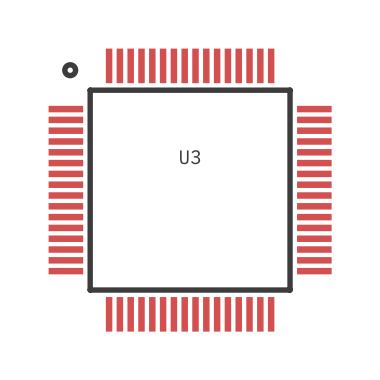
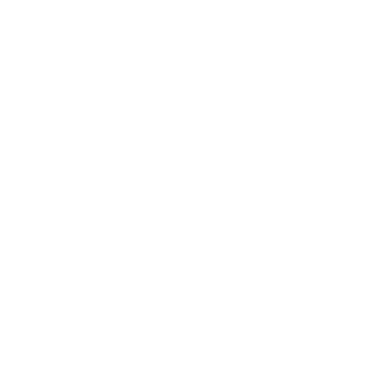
U3: (190, 190) -> none

